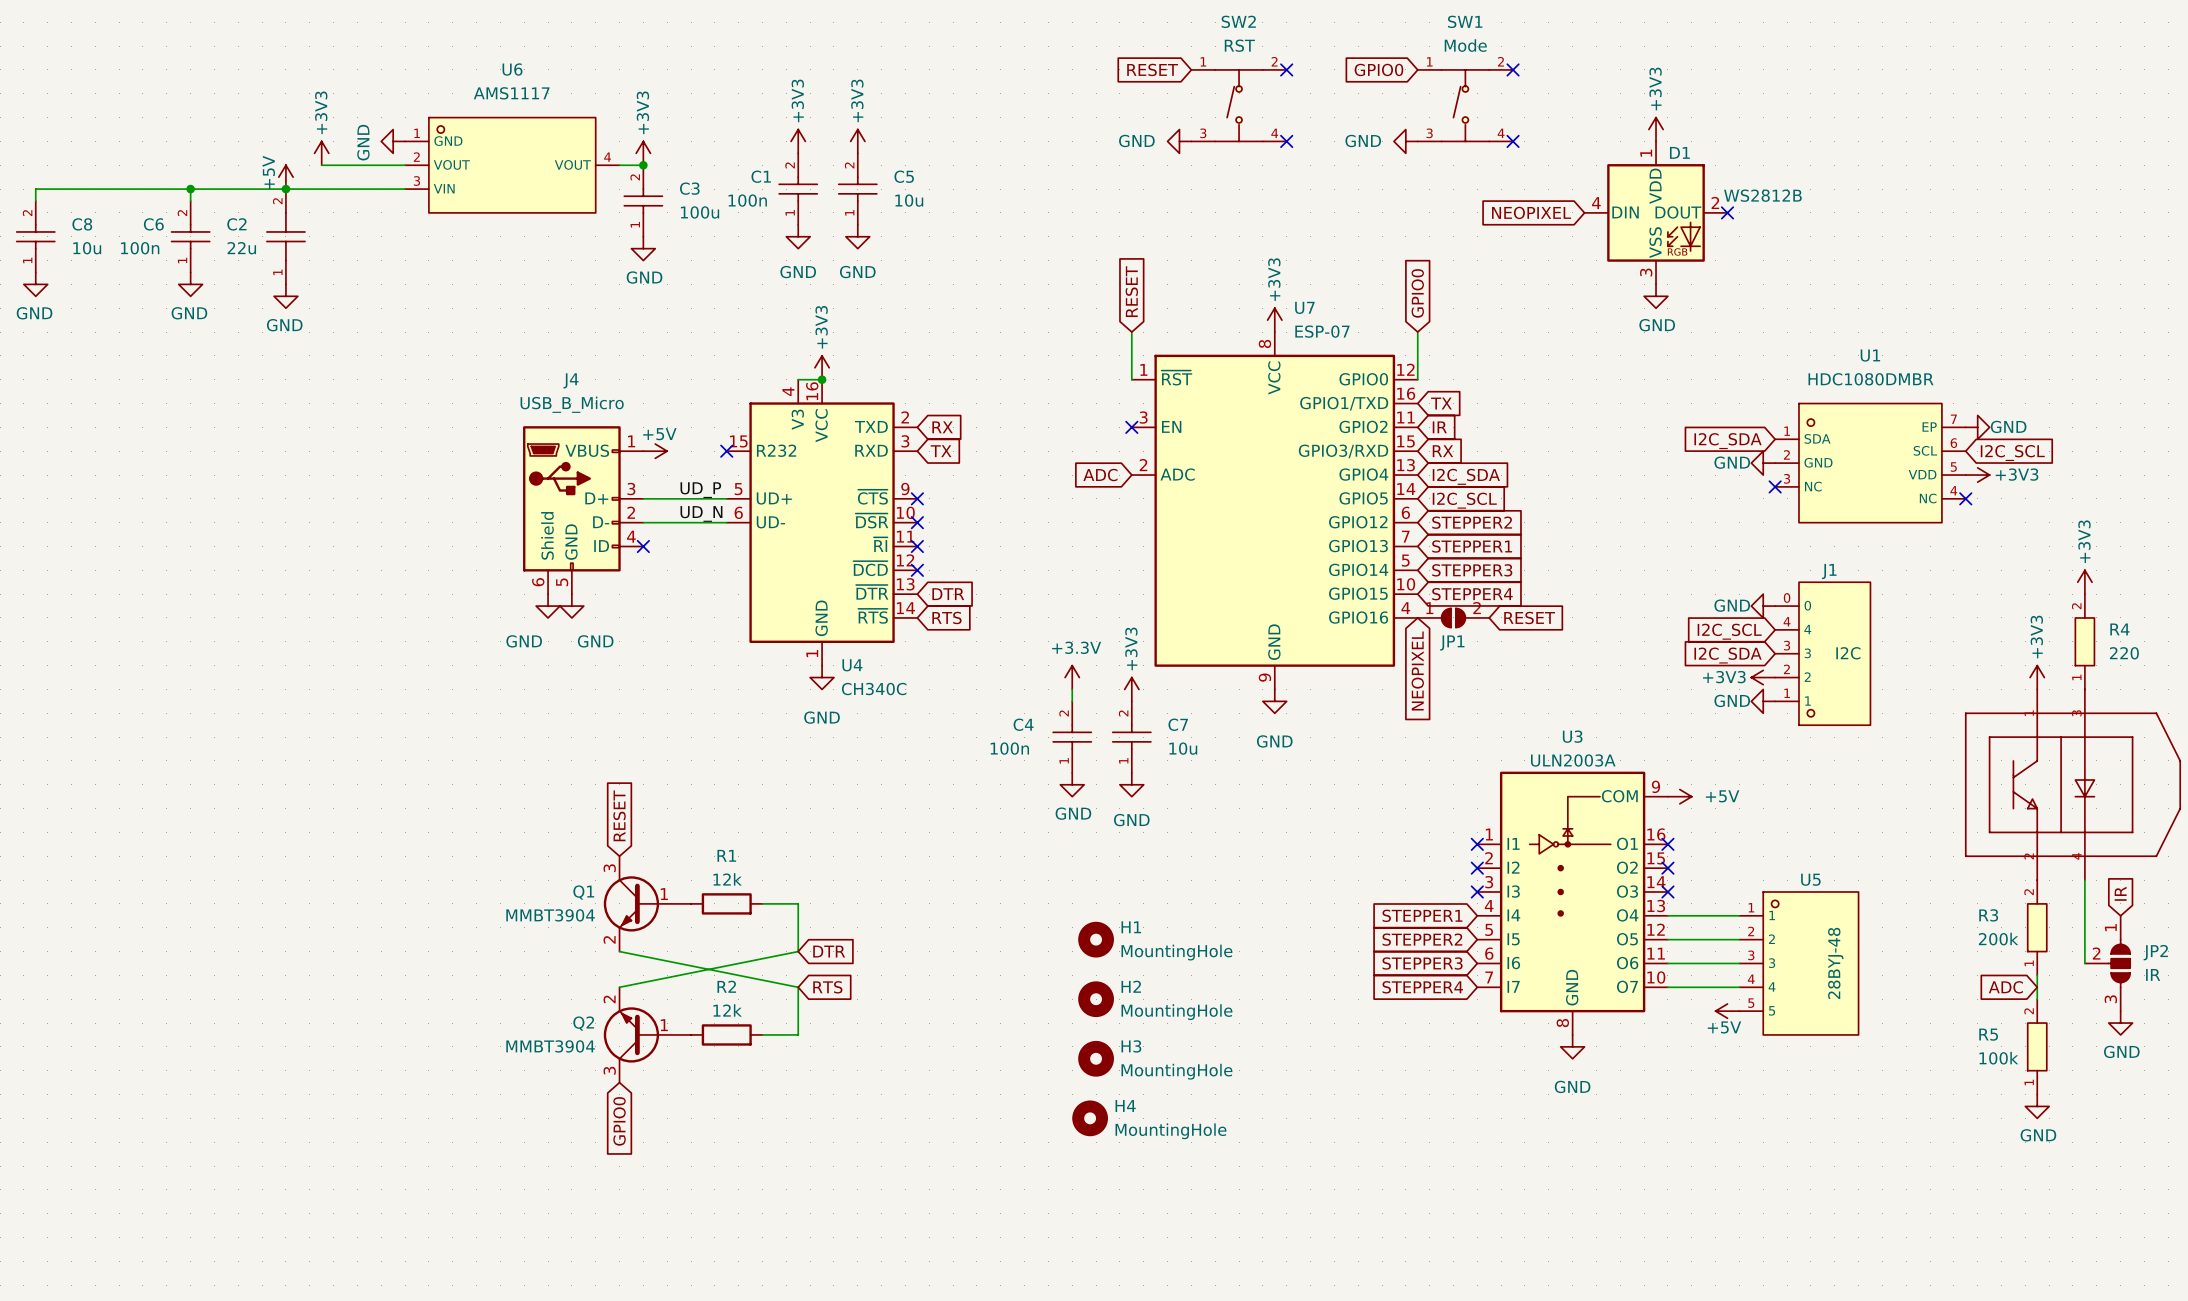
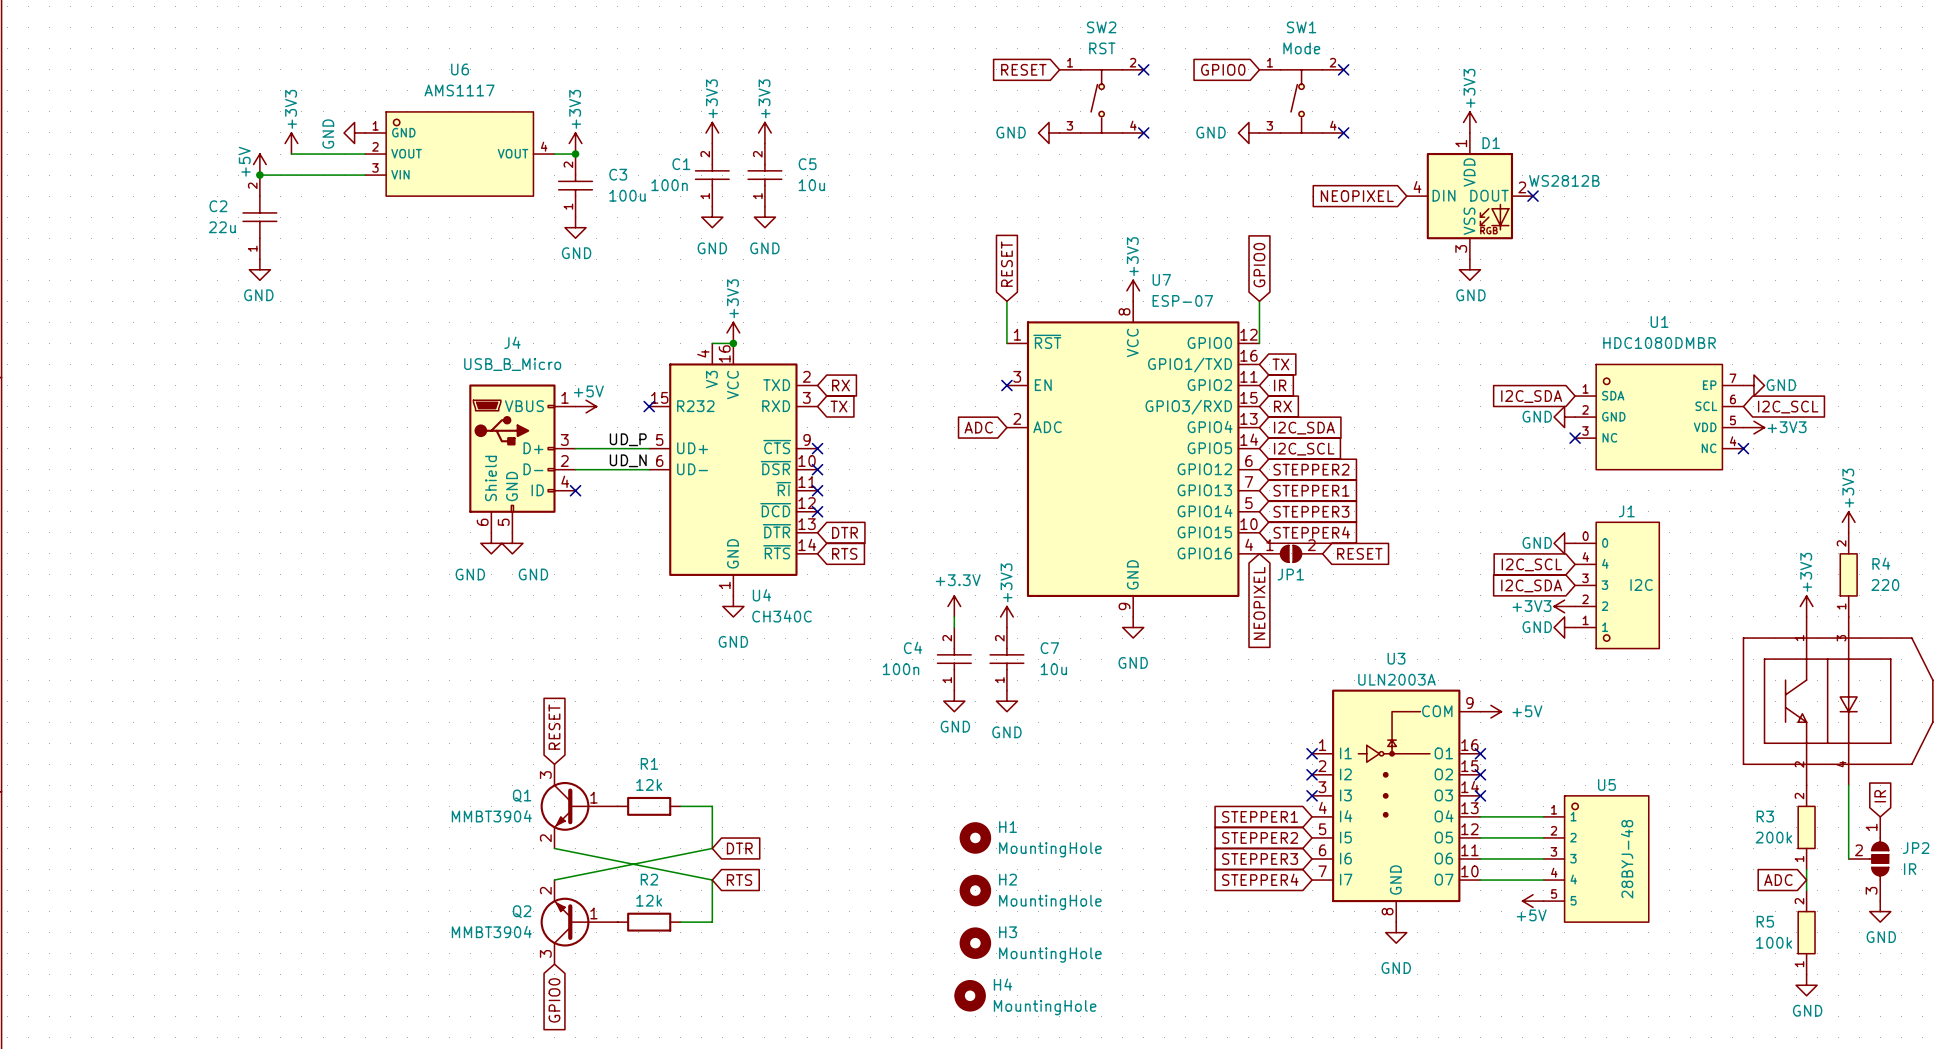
wire: (190, 189) (190, 201) -> none
junction: (190, 189) -> none
wire: (285, 189) (35, 189) (35, 201) -> none
C8: 10u (35, 236) -> none
C6: 100n (190, 236) -> none
power symbol: GND (35, 284) -> none
power symbol: GND (190, 284) -> none

